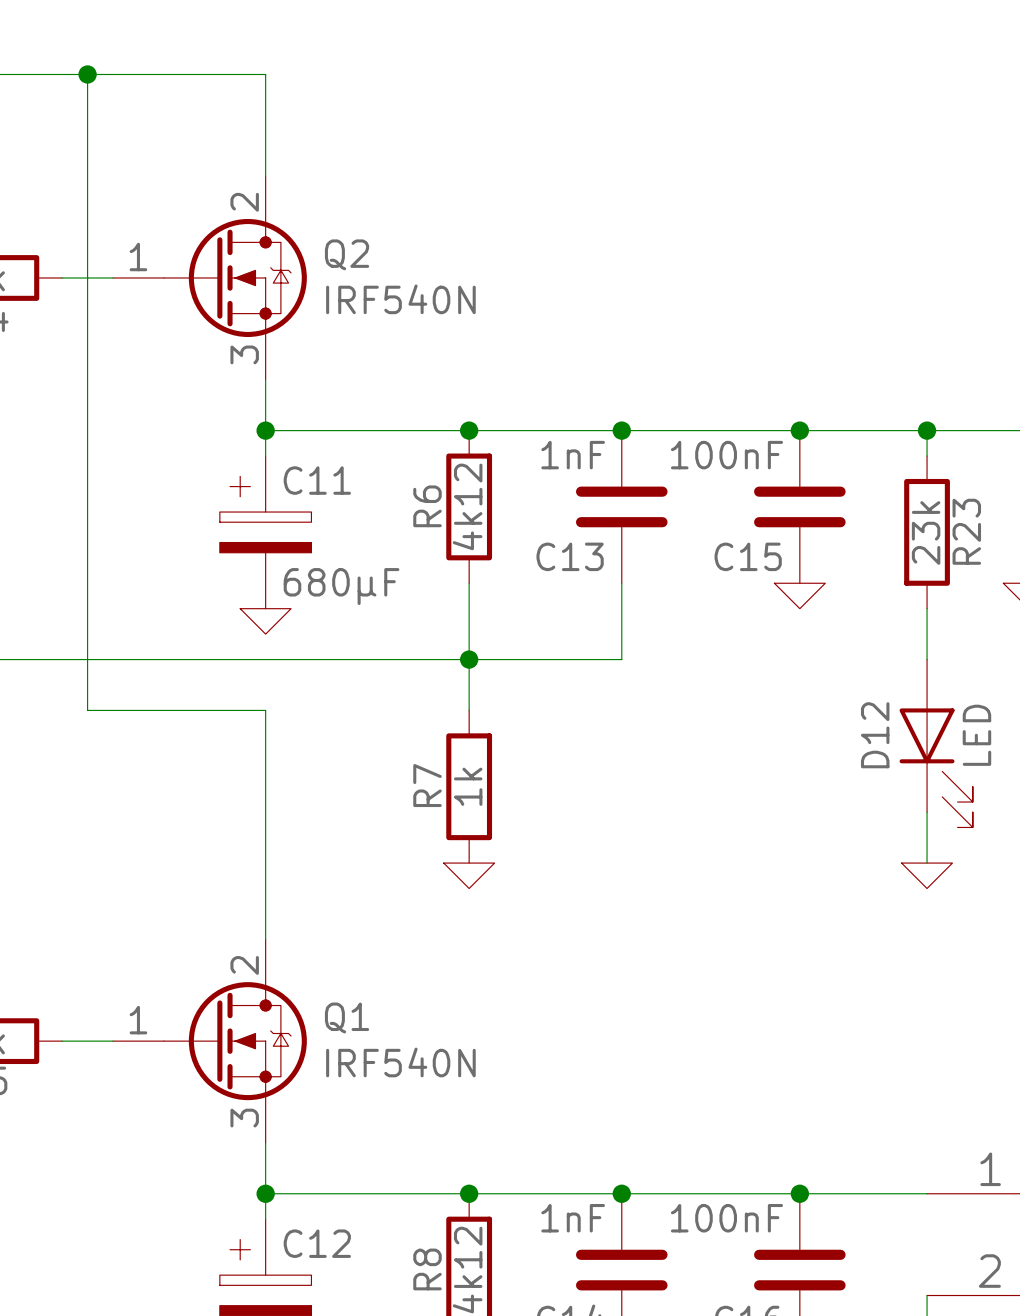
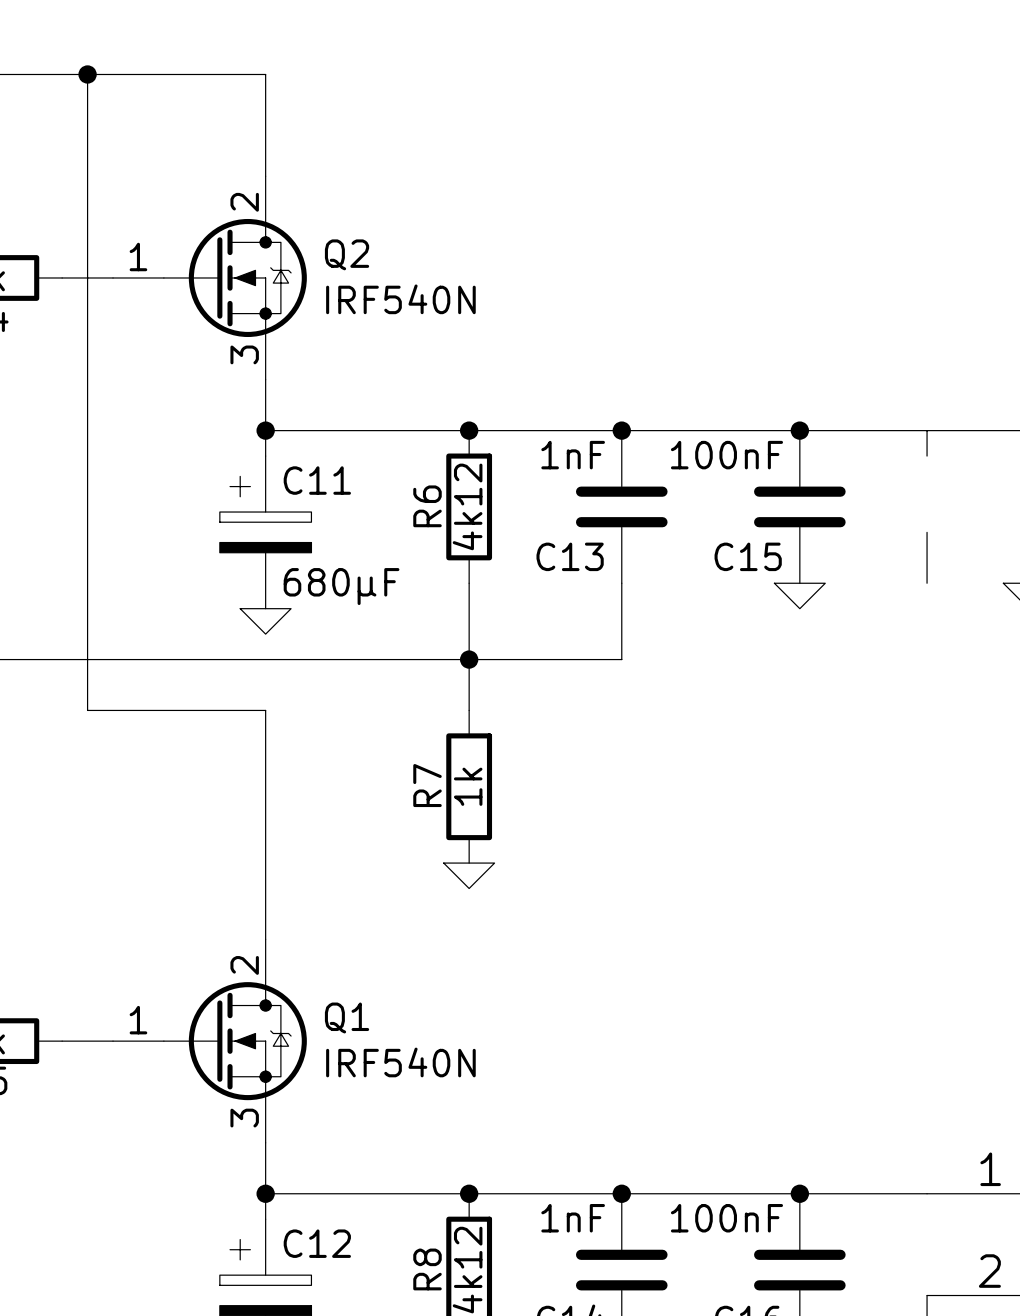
junction: (927, 430) -> none
R23: 23k (927, 532) -> none
wire: (927, 608) (927, 659) -> (927, 532) (927, 583)
D12: LED (936, 743) -> none
wire: (927, 812) (927, 863) -> none
power symbol: (927, 875) -> none

